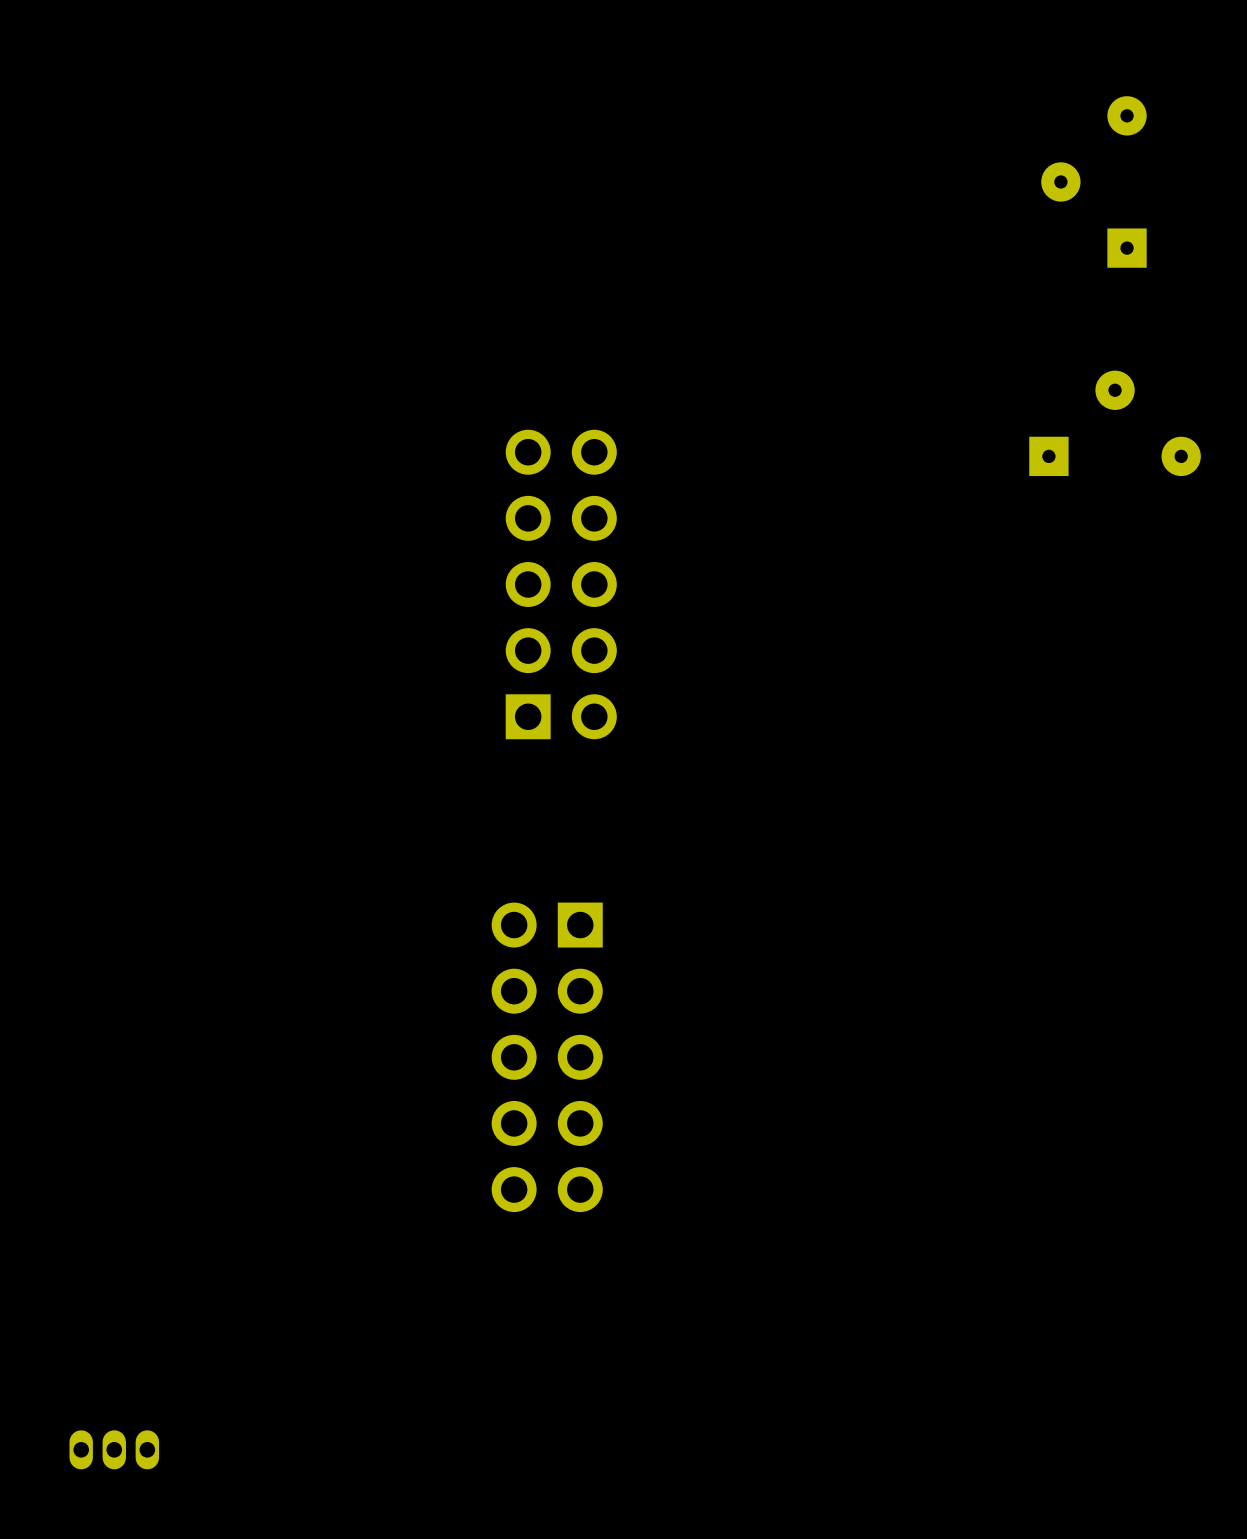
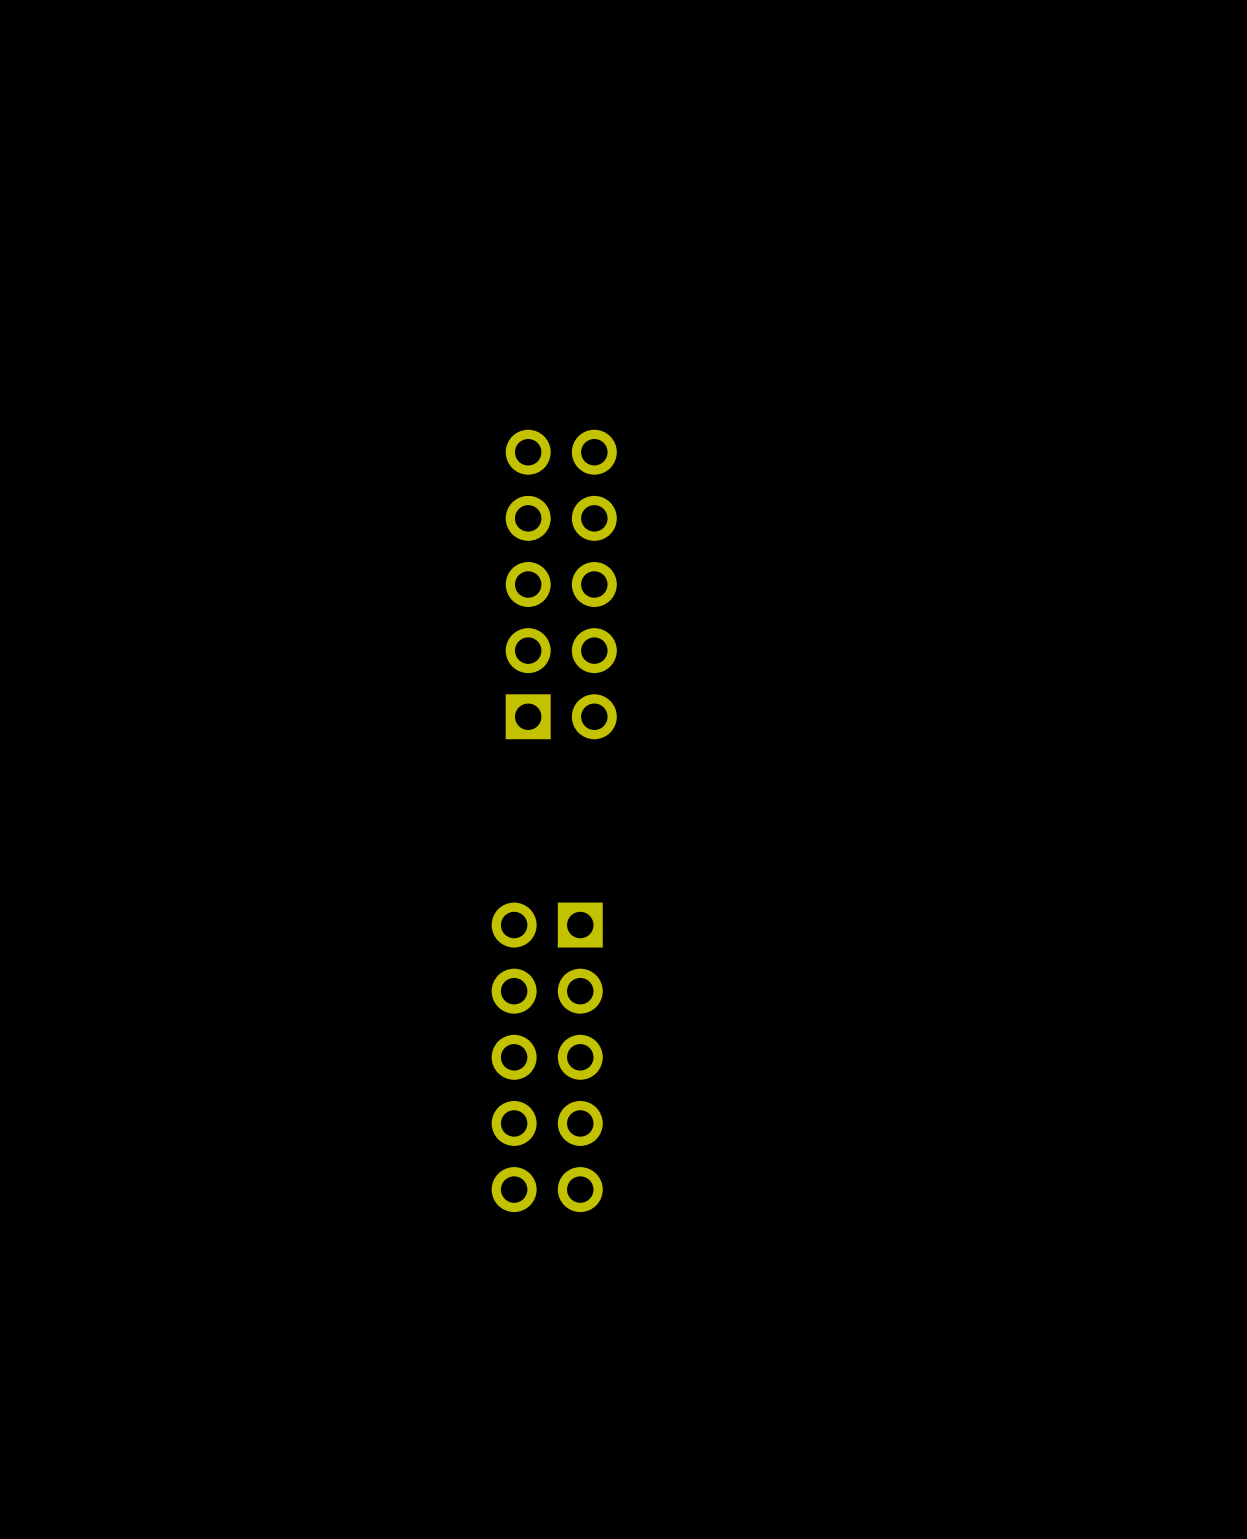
part: (1093, 181) -> none
part: (1115, 423) -> none
part: (114, 1449) -> none

